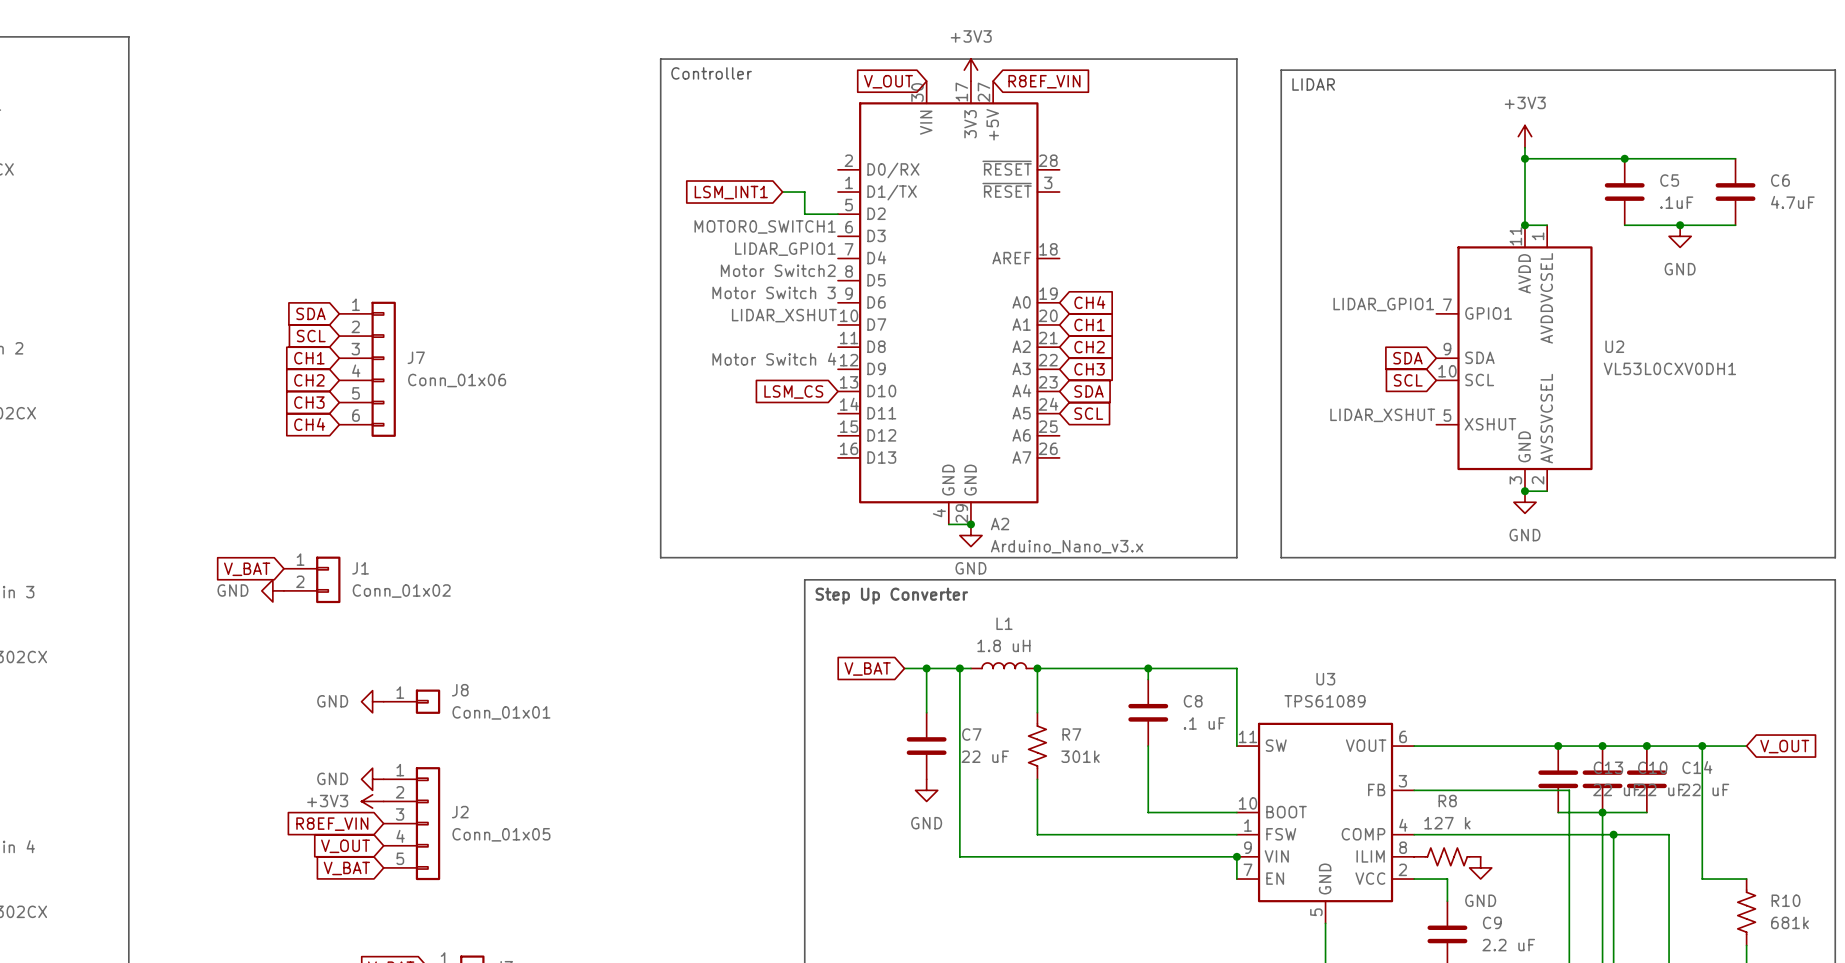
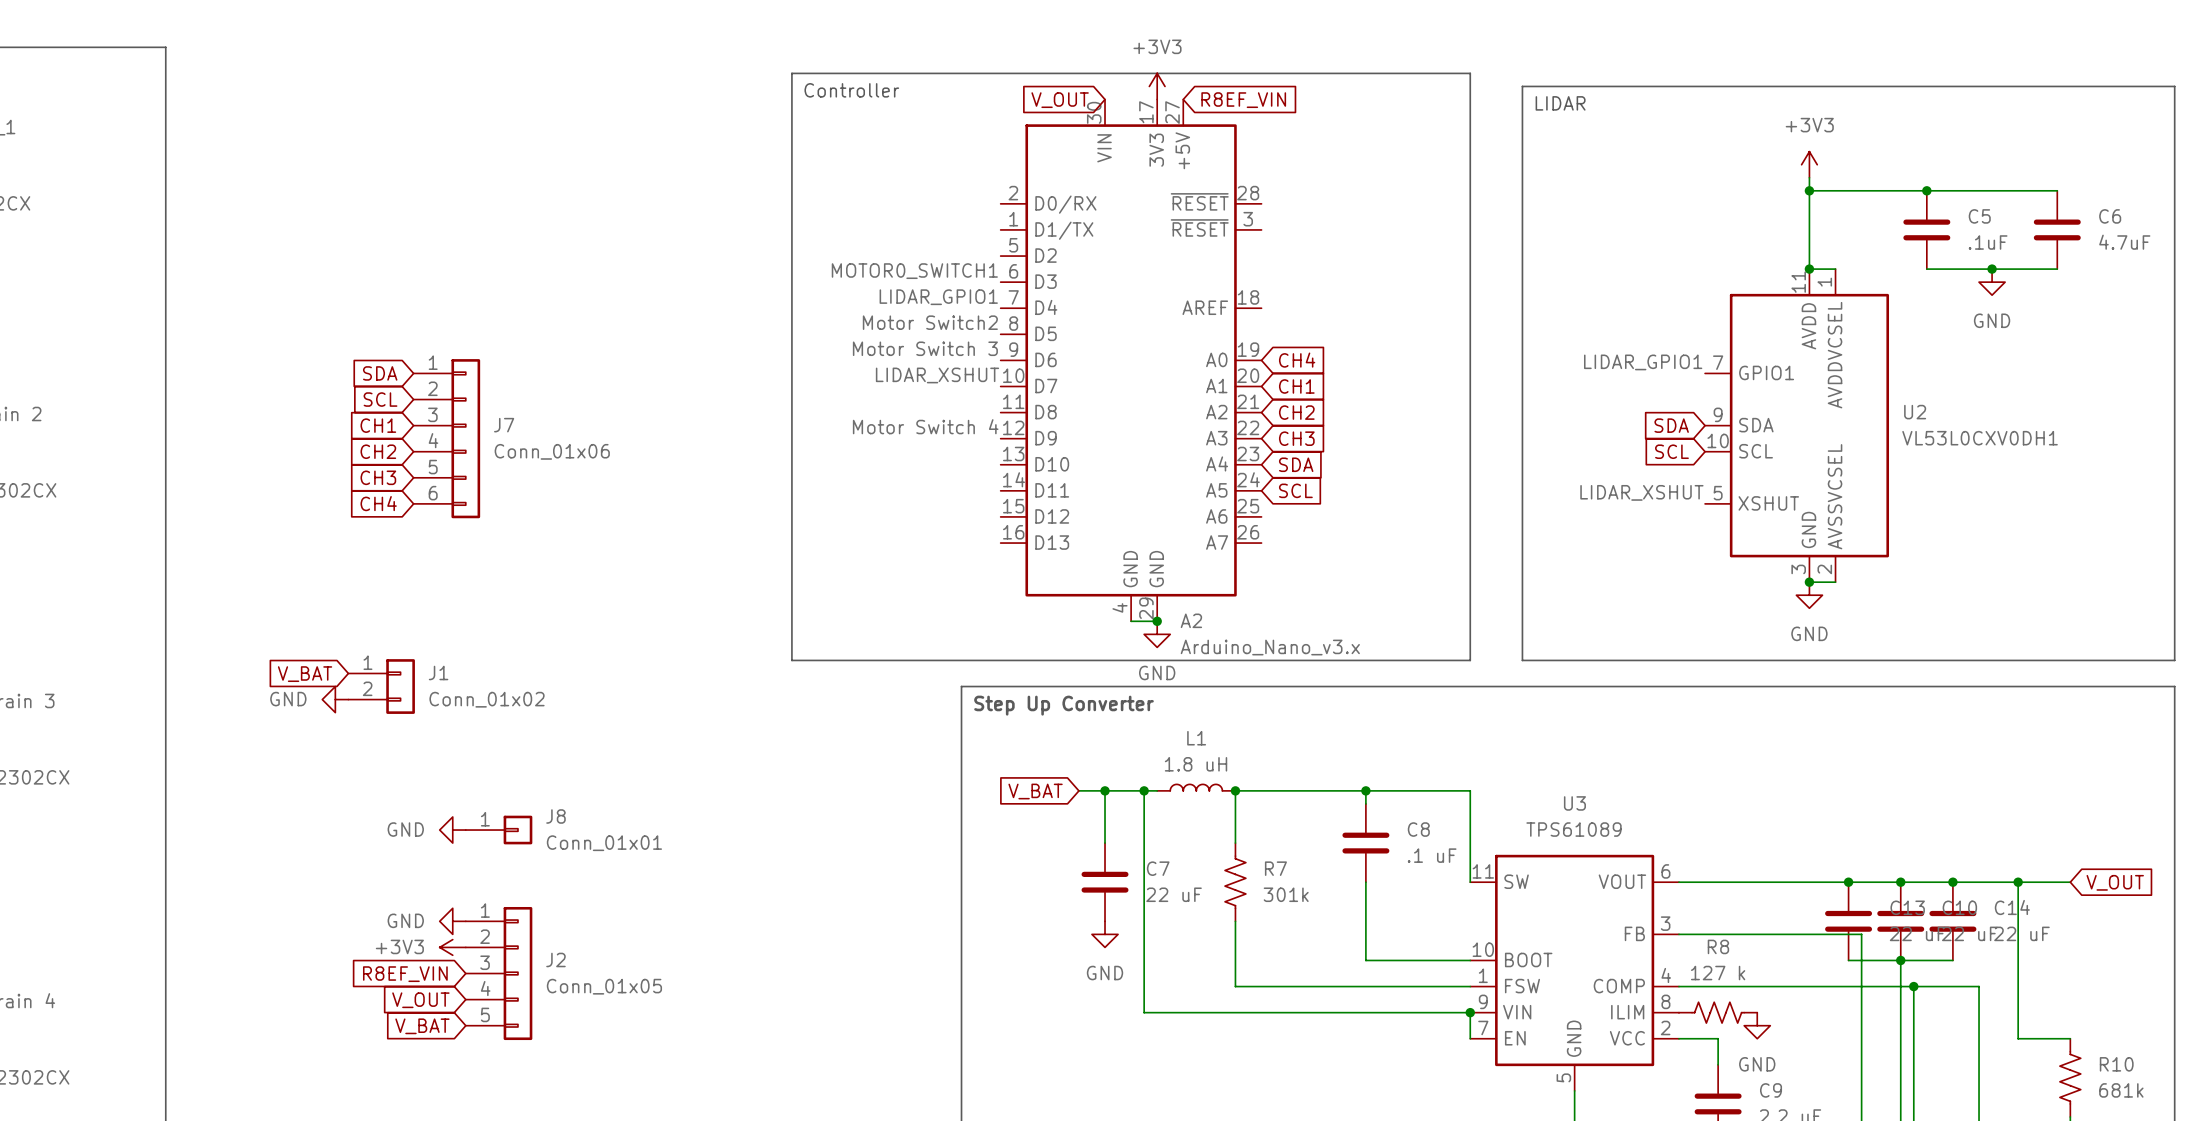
global label: LSM_INT1 (731, 192) -> none
wire: (782, 192) (804, 192) (804, 214) (837, 214) -> none
global label: LSM_CS (793, 391) -> none

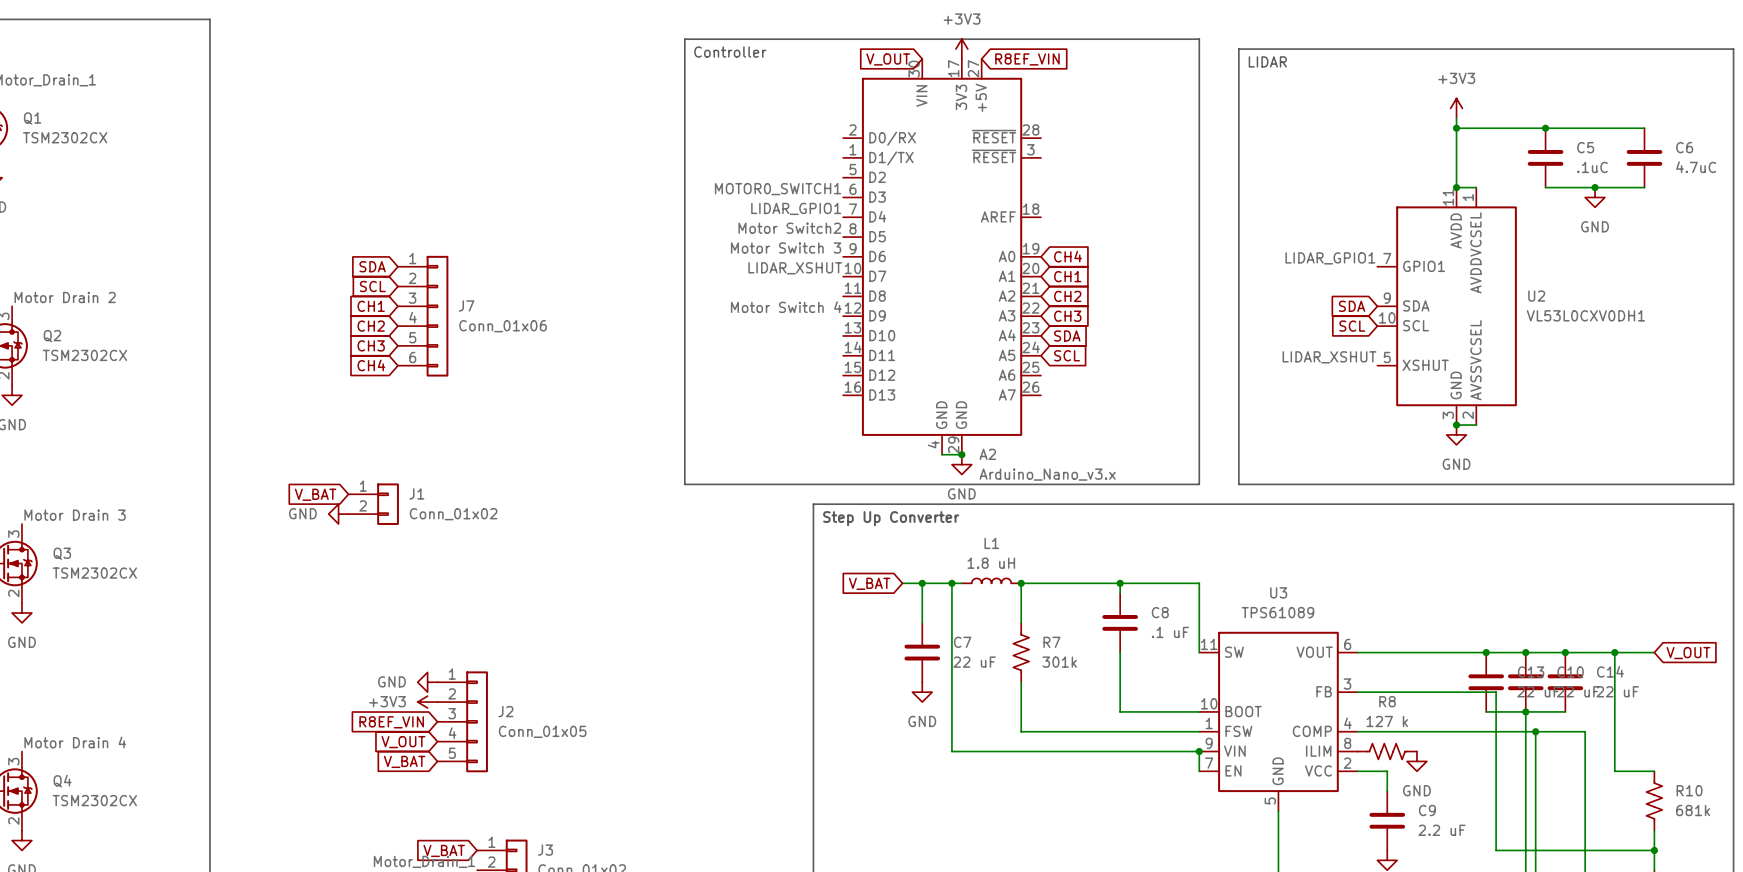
C5 value: .1uF (1988, 242) -> .1uC (1592, 167)
C6 value: 4.7uF (2124, 242) -> 4.7uC (1696, 167)
power symbol: GND (452, 830) -> none
J8: Conn_01x01 (499, 830) -> none

